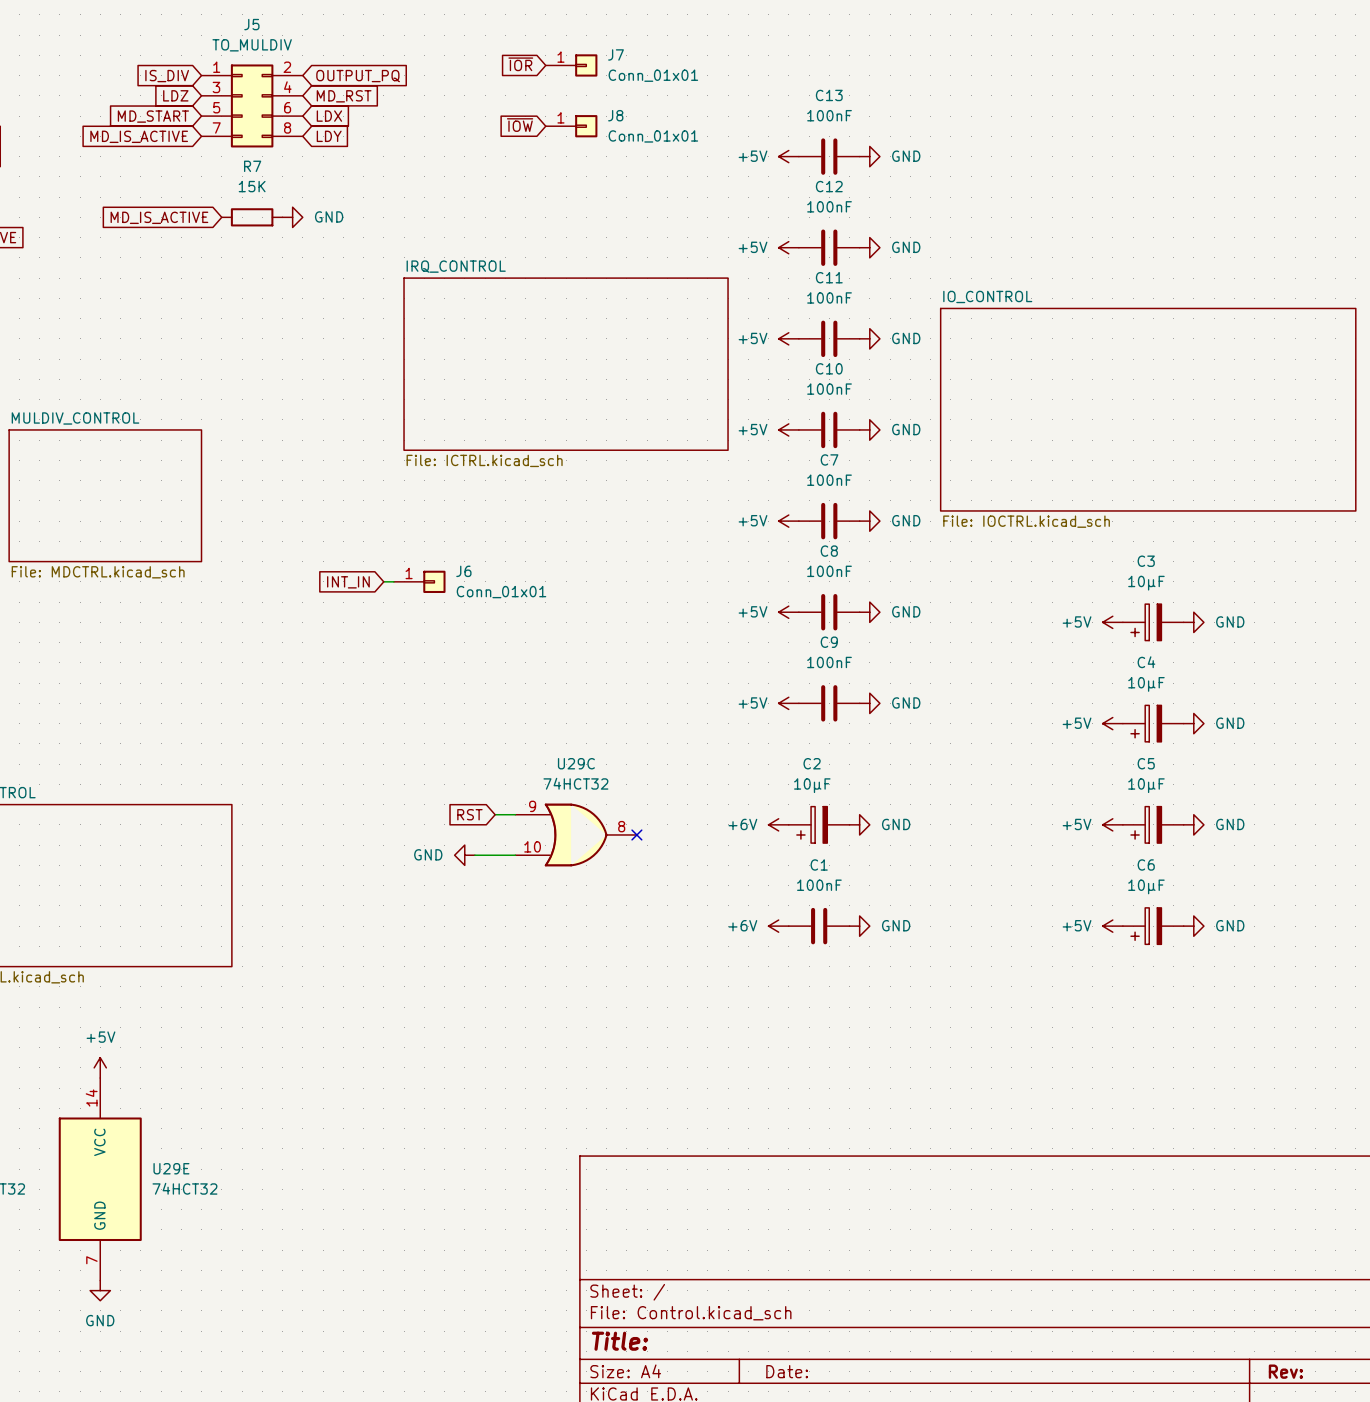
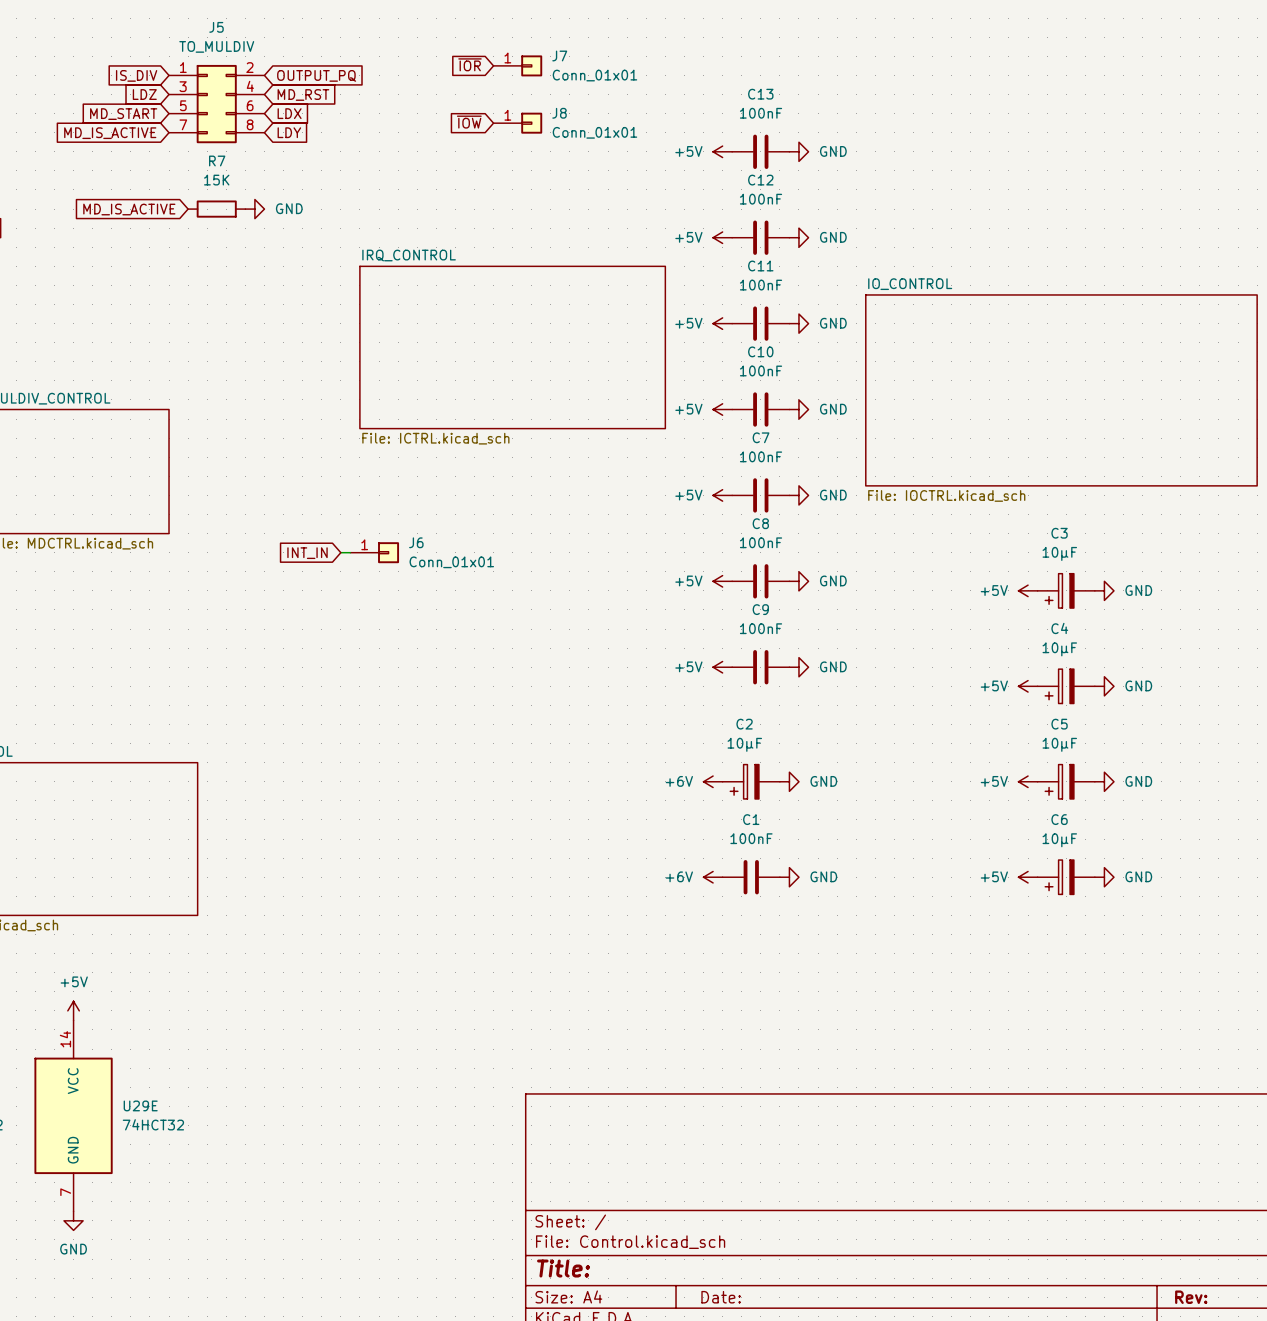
global label: RST (469, 814) -> none
wire: (495, 814) (515, 814) -> none
U29C: 74HCT32 (576, 834) -> none
no-connect mark: (636, 834) -> none
power symbol: GND (464, 855) -> none
wire: (474, 855) (515, 855) -> none

